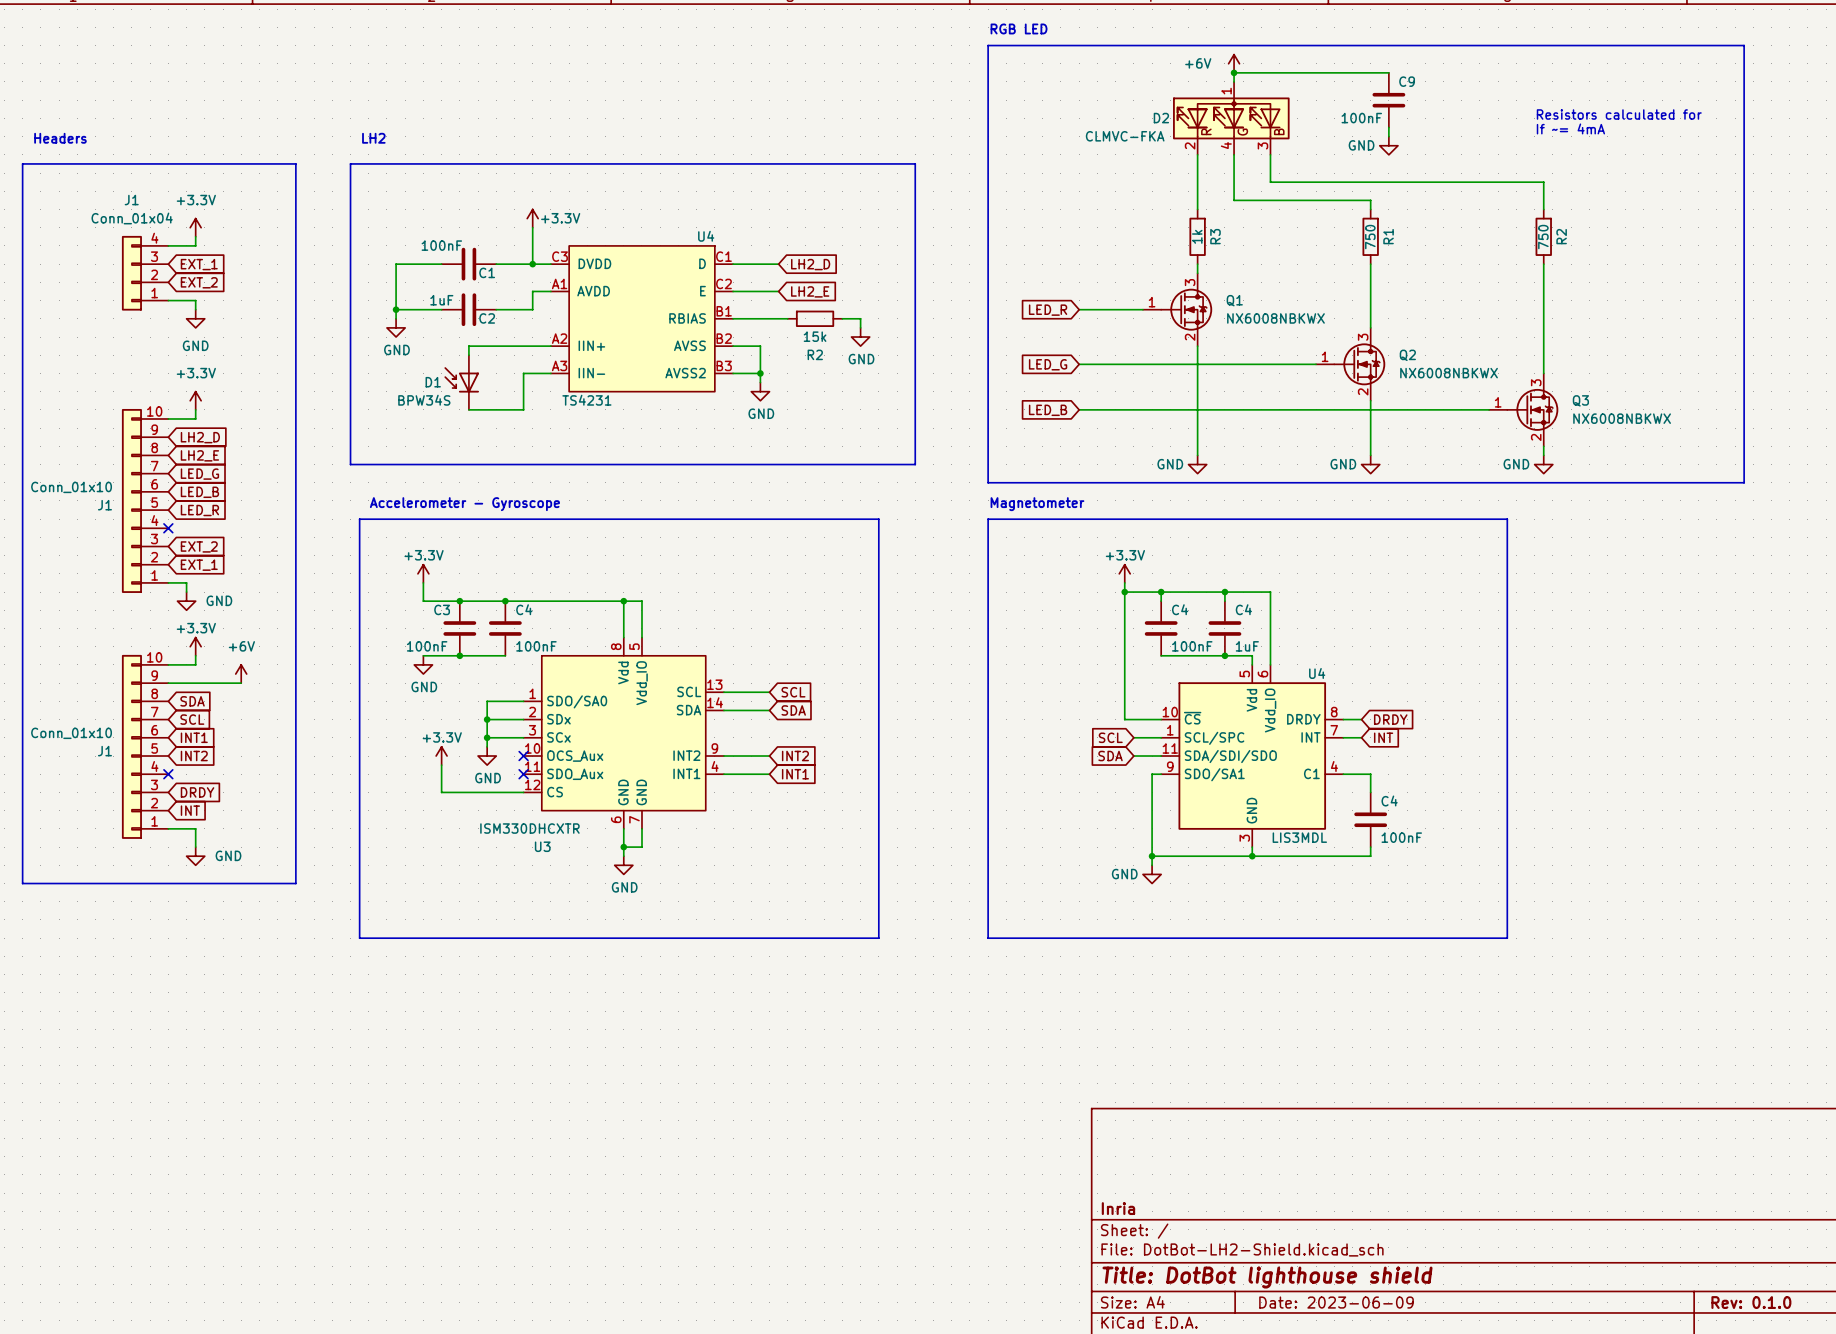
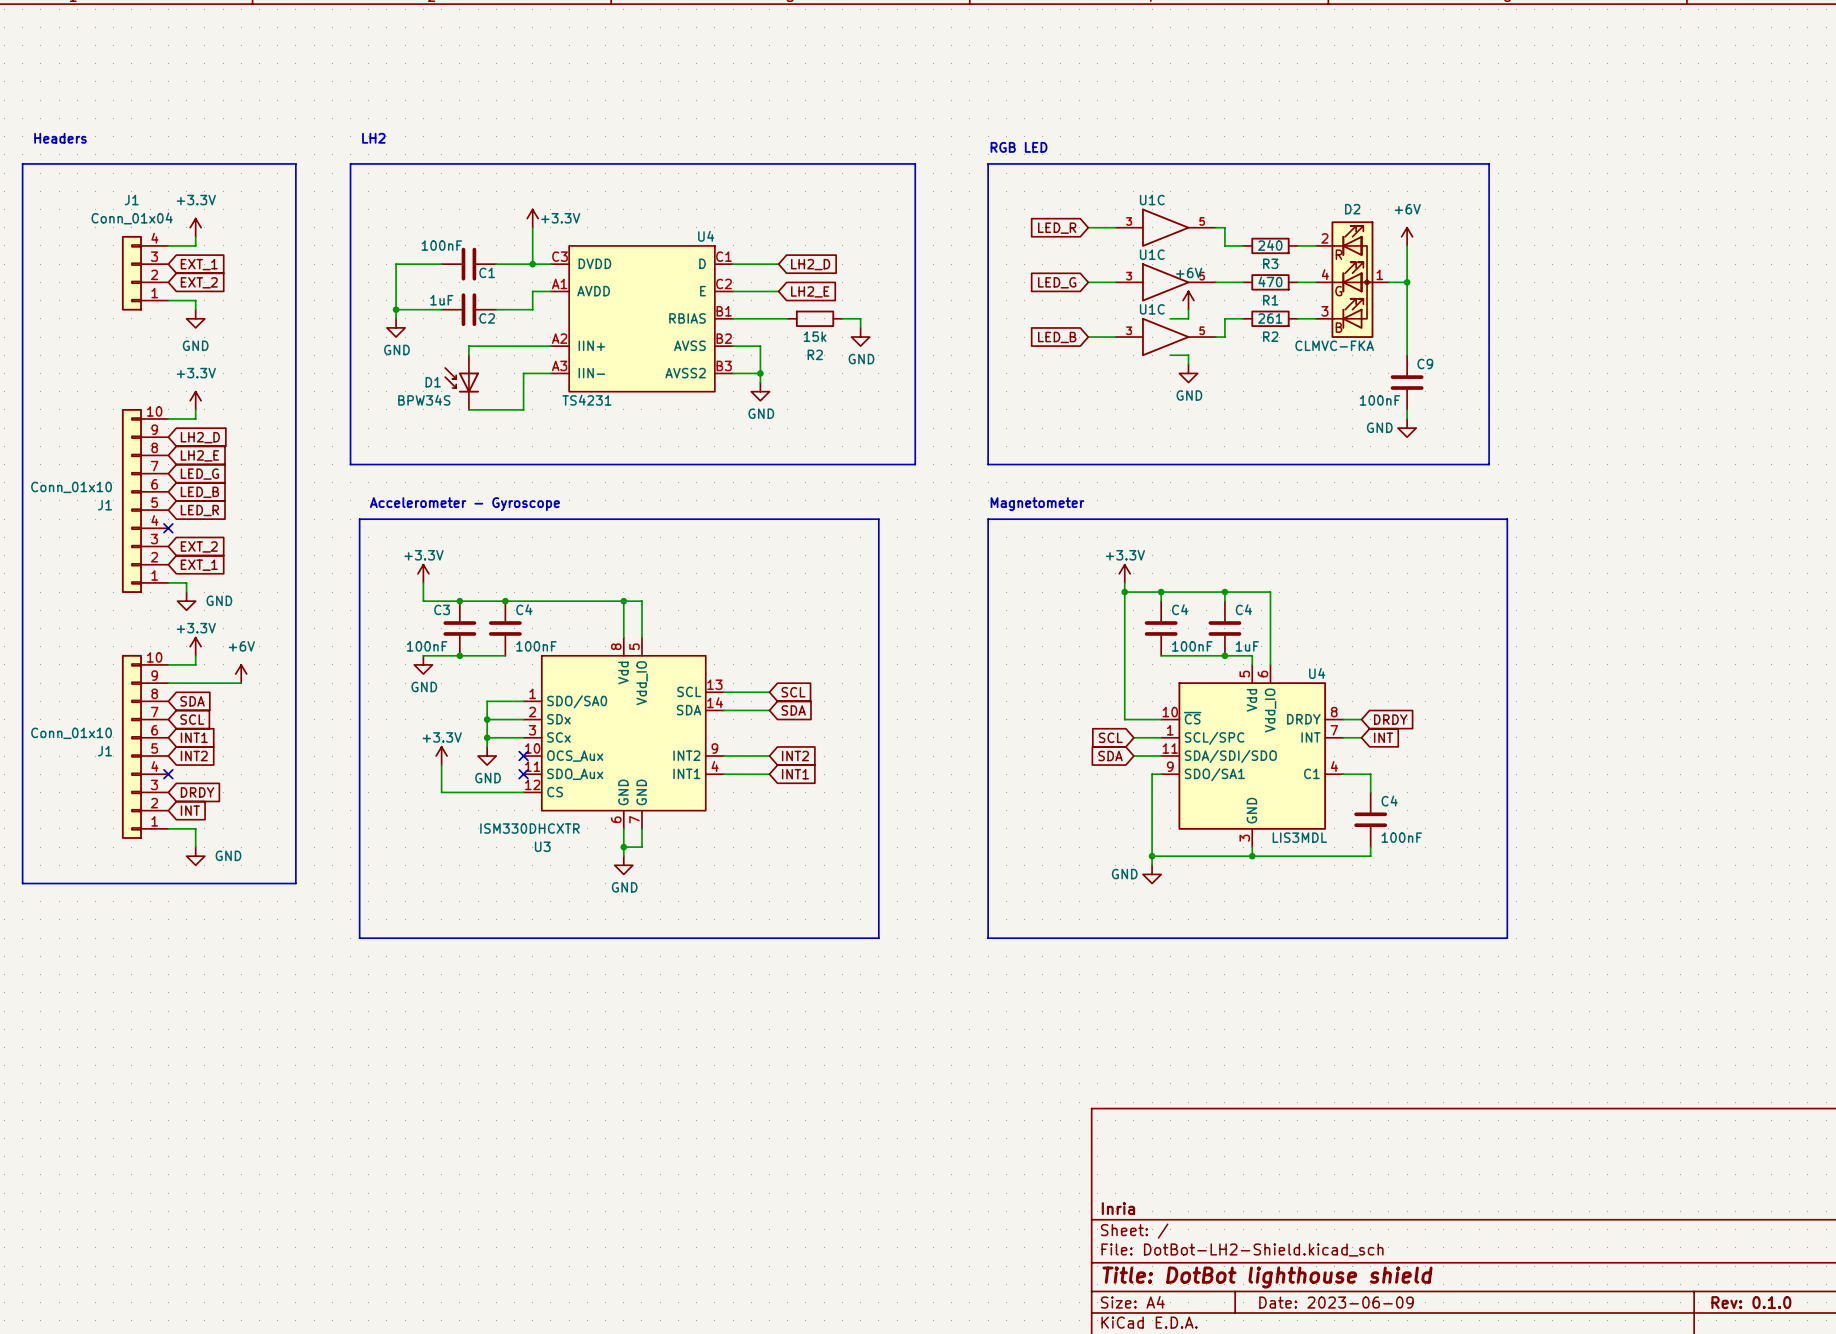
text position: RGB LED (1019, 28) -> RGB LED (1019, 147)
power symbol: +6V (1234, 63) -> none
junction: (1234, 72) -> none
wire: (1388, 72) (1234, 72) (1234, 81) -> none
C9 position: (1388, 100) -> (1407, 382)
text: Resistors calculated for (1619, 114) -> none
D2 rotation: 0° (1231, 118) -> 90° clockwise (1352, 279)
D2 position: (1231, 118) -> (1352, 279)
wire: (1388, 127) (1388, 136) -> none
text: If ~= 4mA (1570, 128) -> none
D2 value position: CLMVC-FKA (1125, 136) -> CLMVC-FKA (1334, 345)
power symbol: GND (1388, 145) -> none
wire: (1197, 154) (1197, 209) -> none
wire: (1234, 154) (1234, 200) (1370, 200) (1370, 209) -> none
wire: (1270, 154) (1270, 182) (1543, 182) (1543, 209) -> none
line: (988, 163) (988, 45) (1744, 45) (1744, 482) (988, 482) (988, 464) -> (988, 163) (1489, 163) (1489, 464) (988, 464)
wire: none -> (1088, 227) (1115, 227)
U1C: none -> (1165, 227)
wire: none -> (1215, 227) (1224, 227) (1224, 245) (1243, 245)
R3 rotation: 0° (1197, 236) -> 90° clockwise (1270, 245)
R3 position: (1197, 236) -> (1270, 245)
R3 value: 1k (1197, 236) -> 240 (1270, 245)
R1 rotation: 0° (1370, 236) -> 90° clockwise (1270, 282)
R1 position: (1370, 236) -> (1270, 282)
power symbol: none -> +6V (1407, 236)
R2: 750 (1543, 236) -> none
R1 value: 750 (1370, 237) -> 470 (1270, 281)
wire: none -> (1297, 245) (1316, 245)
wire: (1197, 264) (1197, 273) -> none
wire: (1543, 264) (1543, 373) -> (1407, 245) (1407, 355)
wire: none -> (1088, 282) (1115, 282)
U1C: none -> (1165, 282)
wire: none -> (1215, 282) (1243, 282)
wire: none -> (1297, 282) (1316, 282)
wire: none -> (1388, 282) (1407, 282)
junction: none -> (1407, 282)
power symbol: none -> +6V (1188, 300)
wire: (1079, 309) (1142, 309) -> none
Q1: NX6008NBKWX (1177, 309) -> none
wire: none -> (1188, 309) (1188, 318) (1170, 318)
global label position: LED_R (1048, 310) -> LED_R (1057, 228)
wire: none -> (1243, 318) (1224, 318) (1224, 337) (1215, 337)
R2: none -> 261 (1270, 318)
wire: none -> (1088, 337) (1115, 337)
U1C: none -> (1165, 337)
wire: (1197, 346) (1197, 455) -> none
wire: none -> (1170, 355) (1188, 355) (1188, 364)
global label position: LED_G (1048, 364) -> LED_G (1057, 282)
wire: (1079, 364) (1316, 364) -> none
Q2: NX6008NBKWX (1350, 364) -> none
wire: (1370, 400) (1370, 455) -> none
wire: (1079, 409) (1489, 409) -> none
Q3: NX6008NBKWX (1523, 409) -> none
global label position: LED_B (1048, 410) -> LED_B (1057, 337)
wire: (1543, 446) (1543, 455) -> (1407, 409) (1407, 418)
power symbol text position: GND (1170, 464) -> GND (1189, 395)
power symbol position: GND (1197, 464) -> GND (1188, 373)
power symbol position: GND (1370, 464) -> GND (1407, 428)
power symbol: GND (1543, 464) -> none

